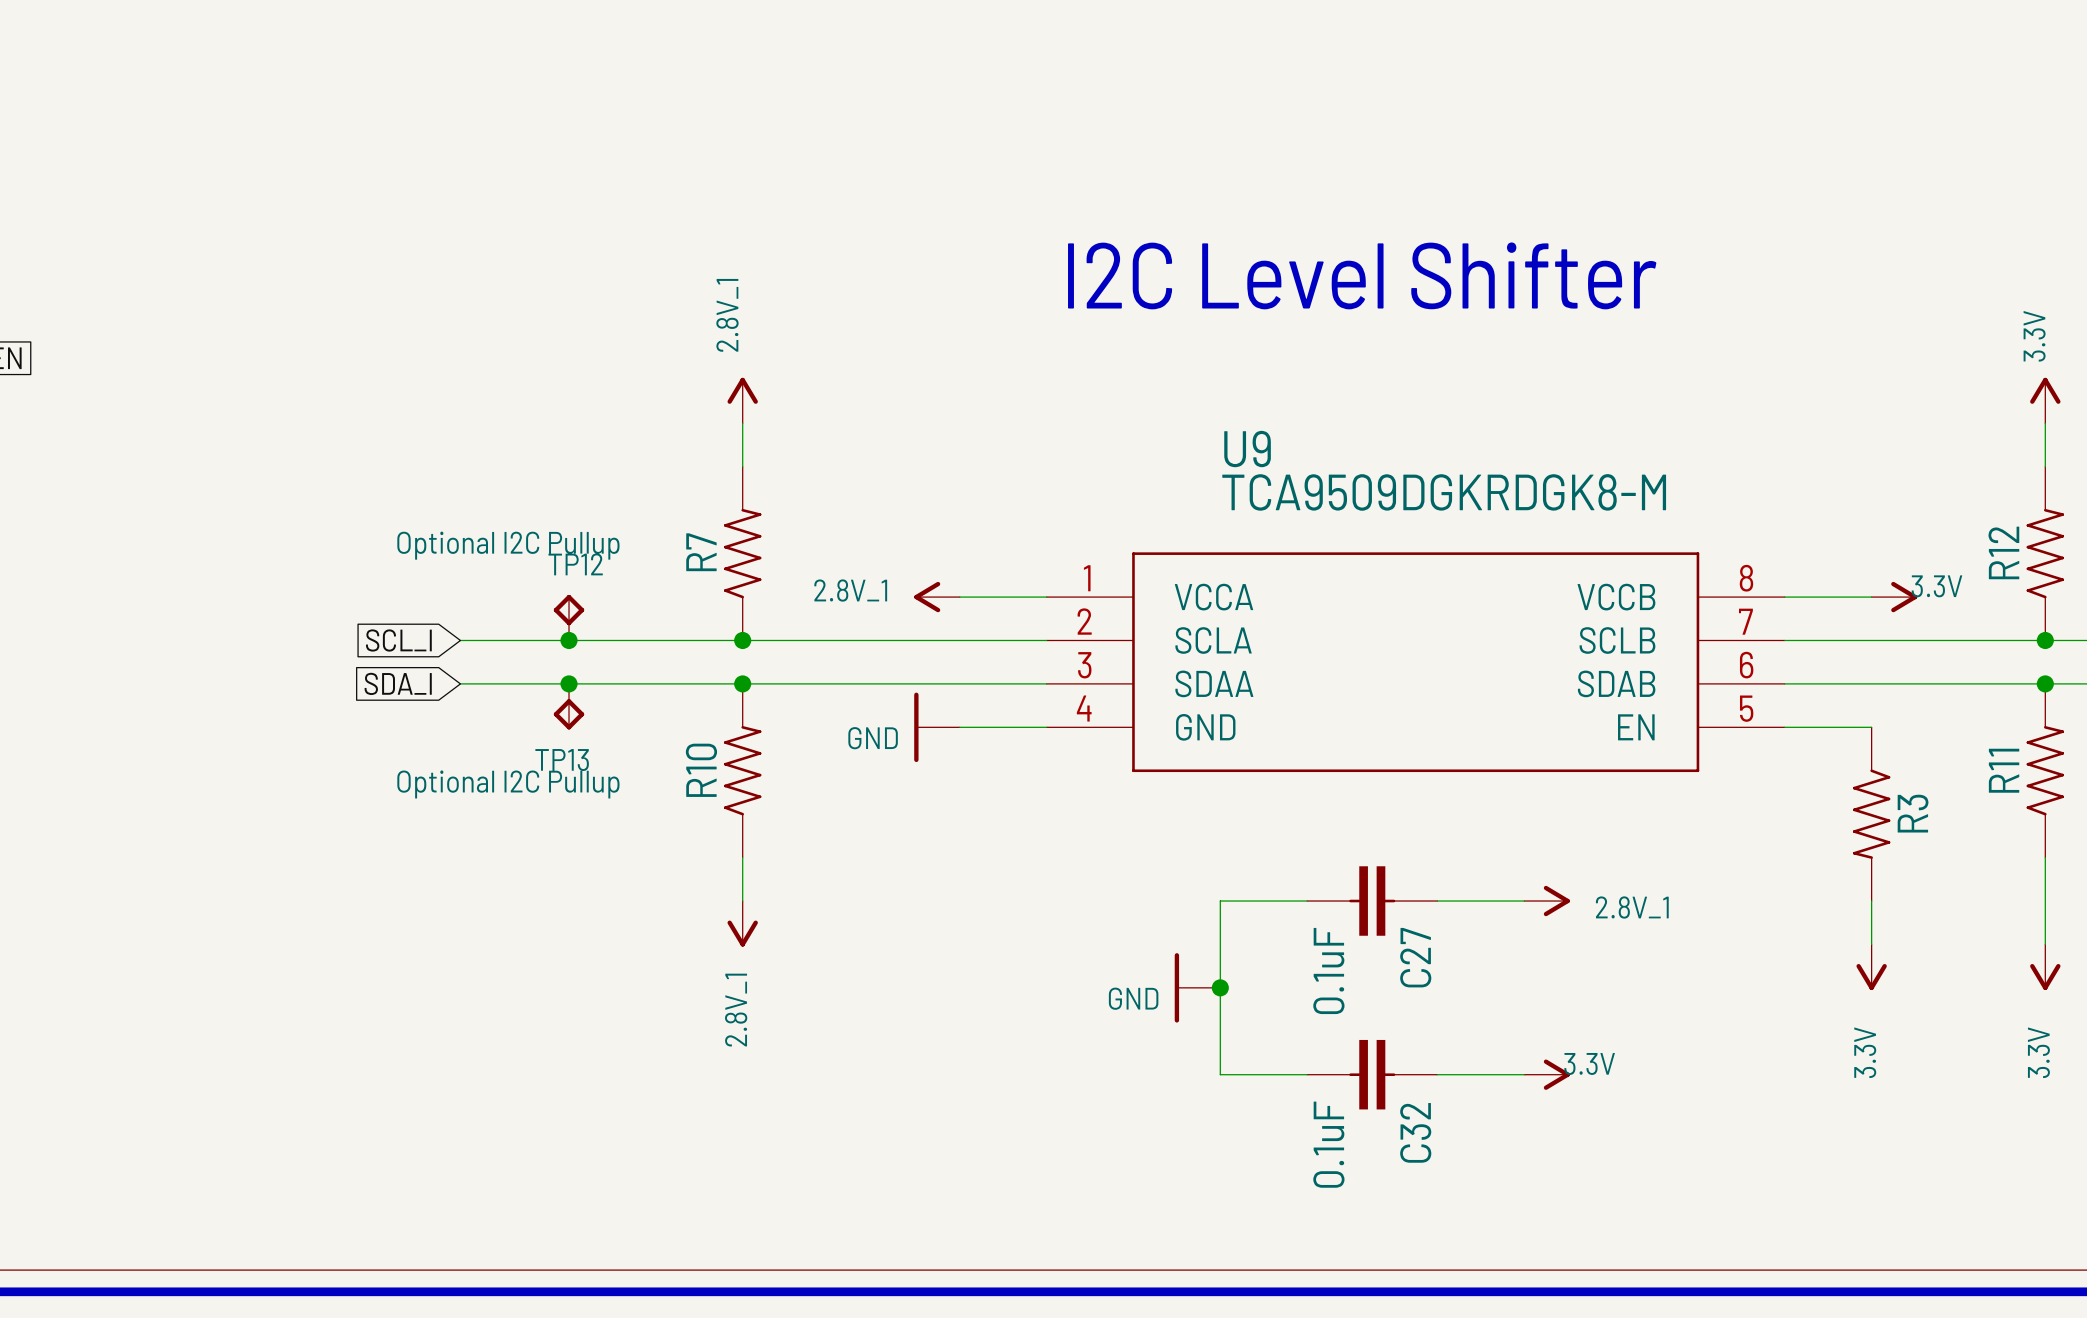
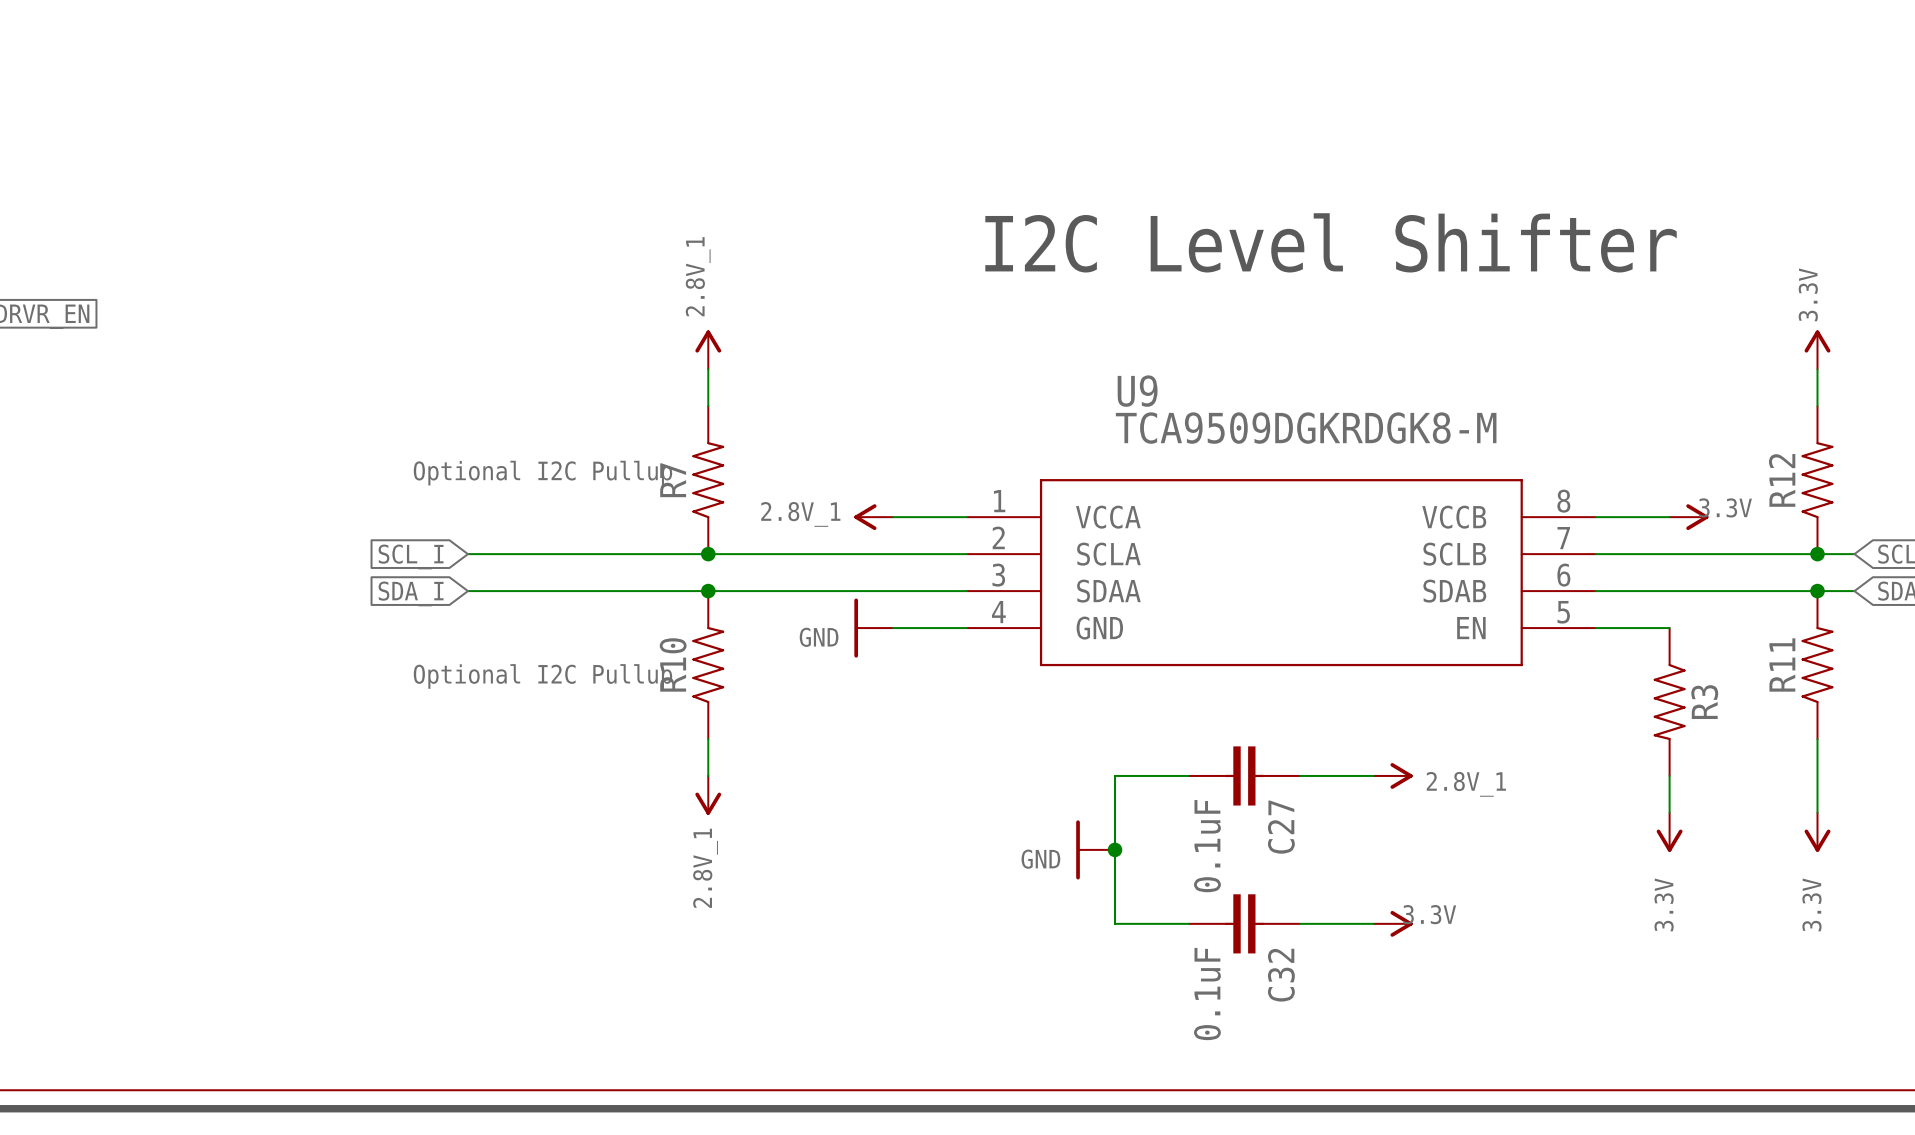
TP12: (569, 617) -> none
junction: (569, 640) -> none
junction: (569, 683) -> none
TP13: (569, 706) -> none

